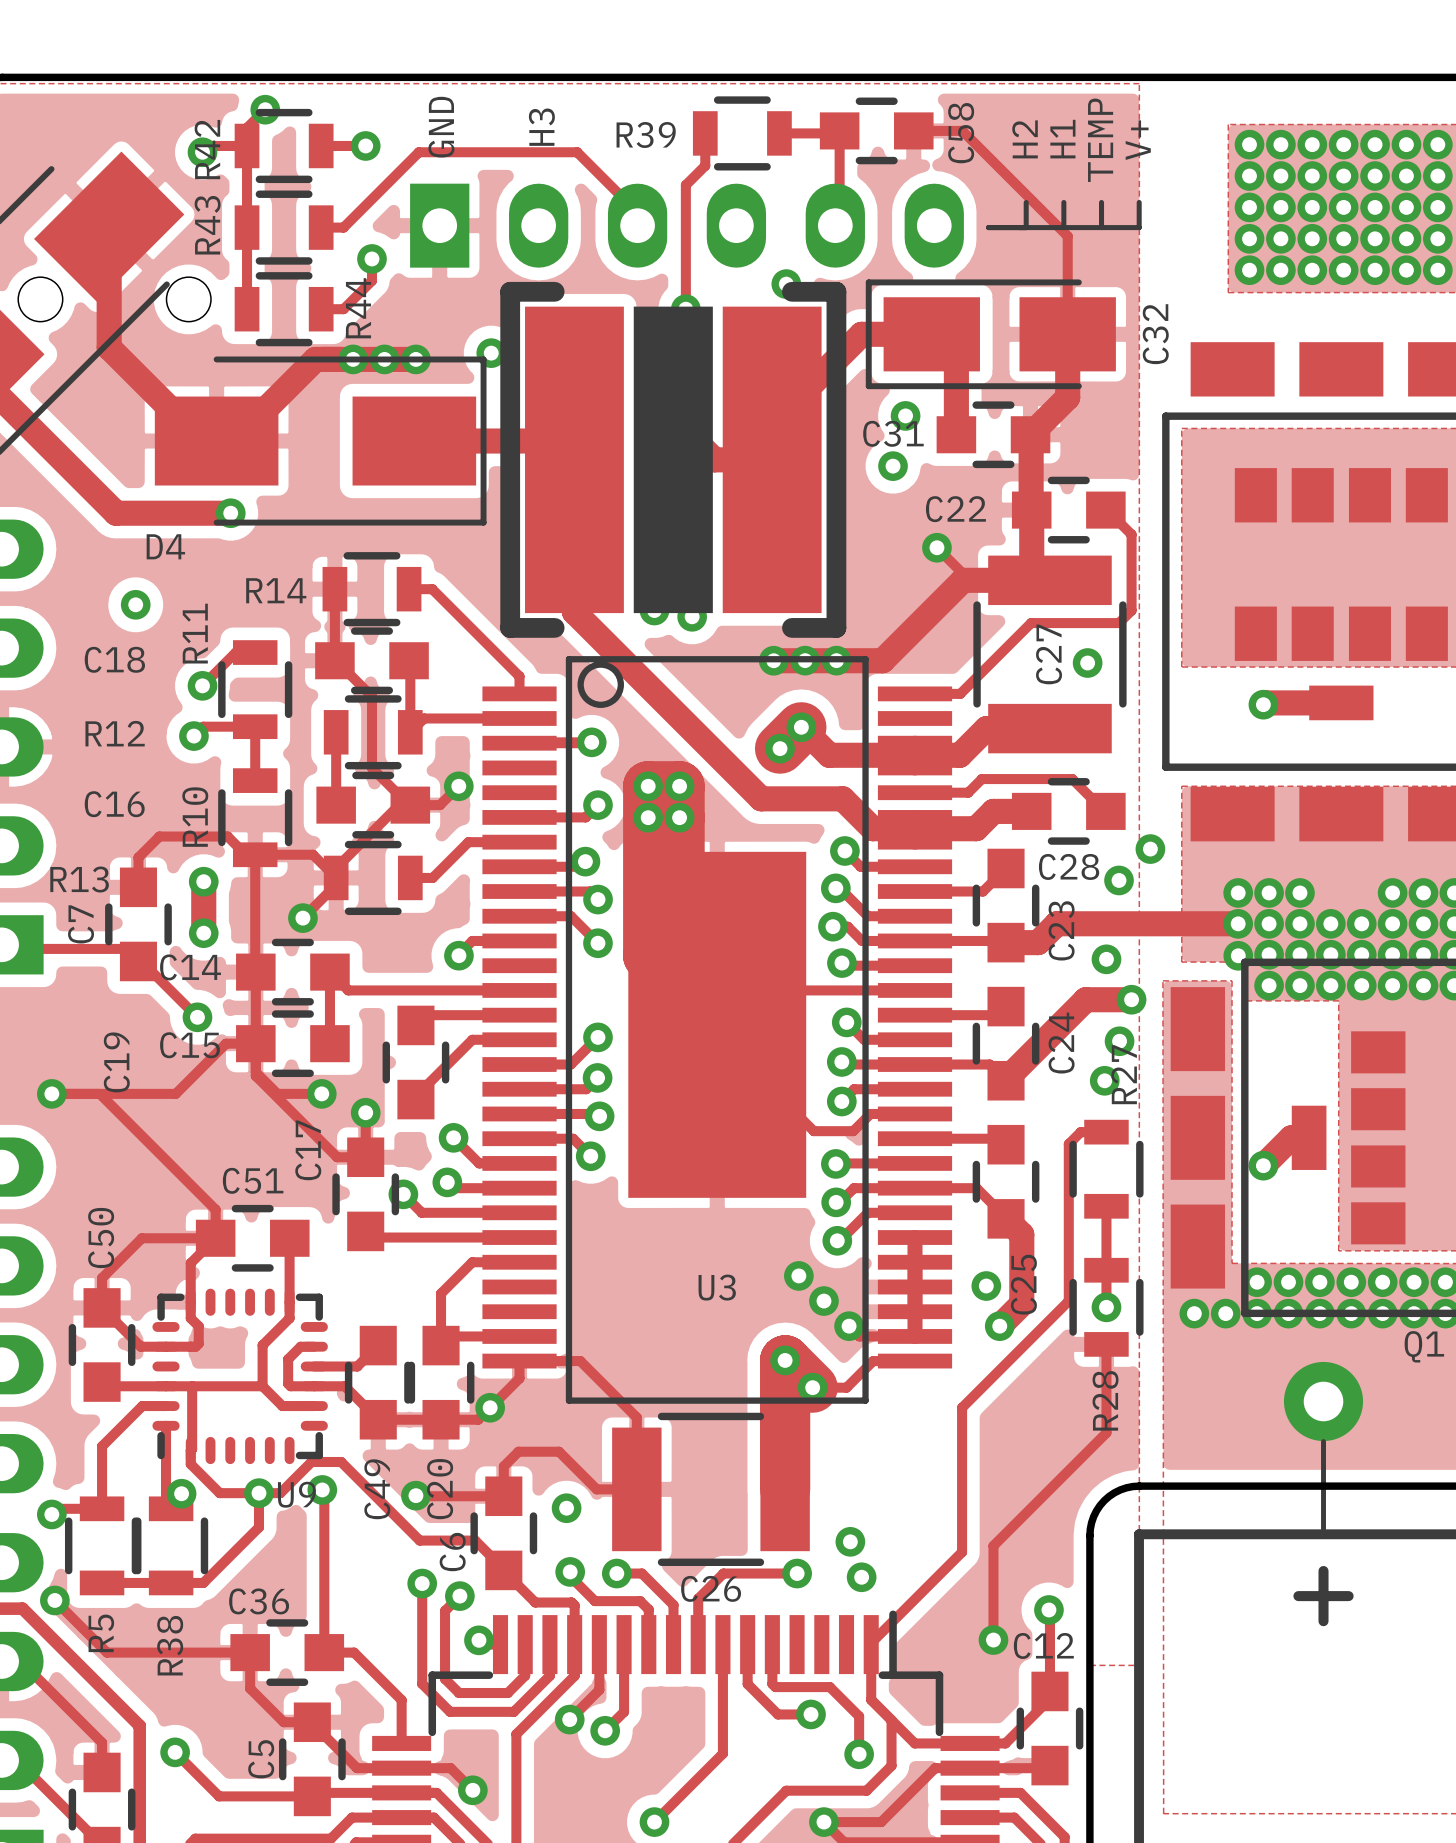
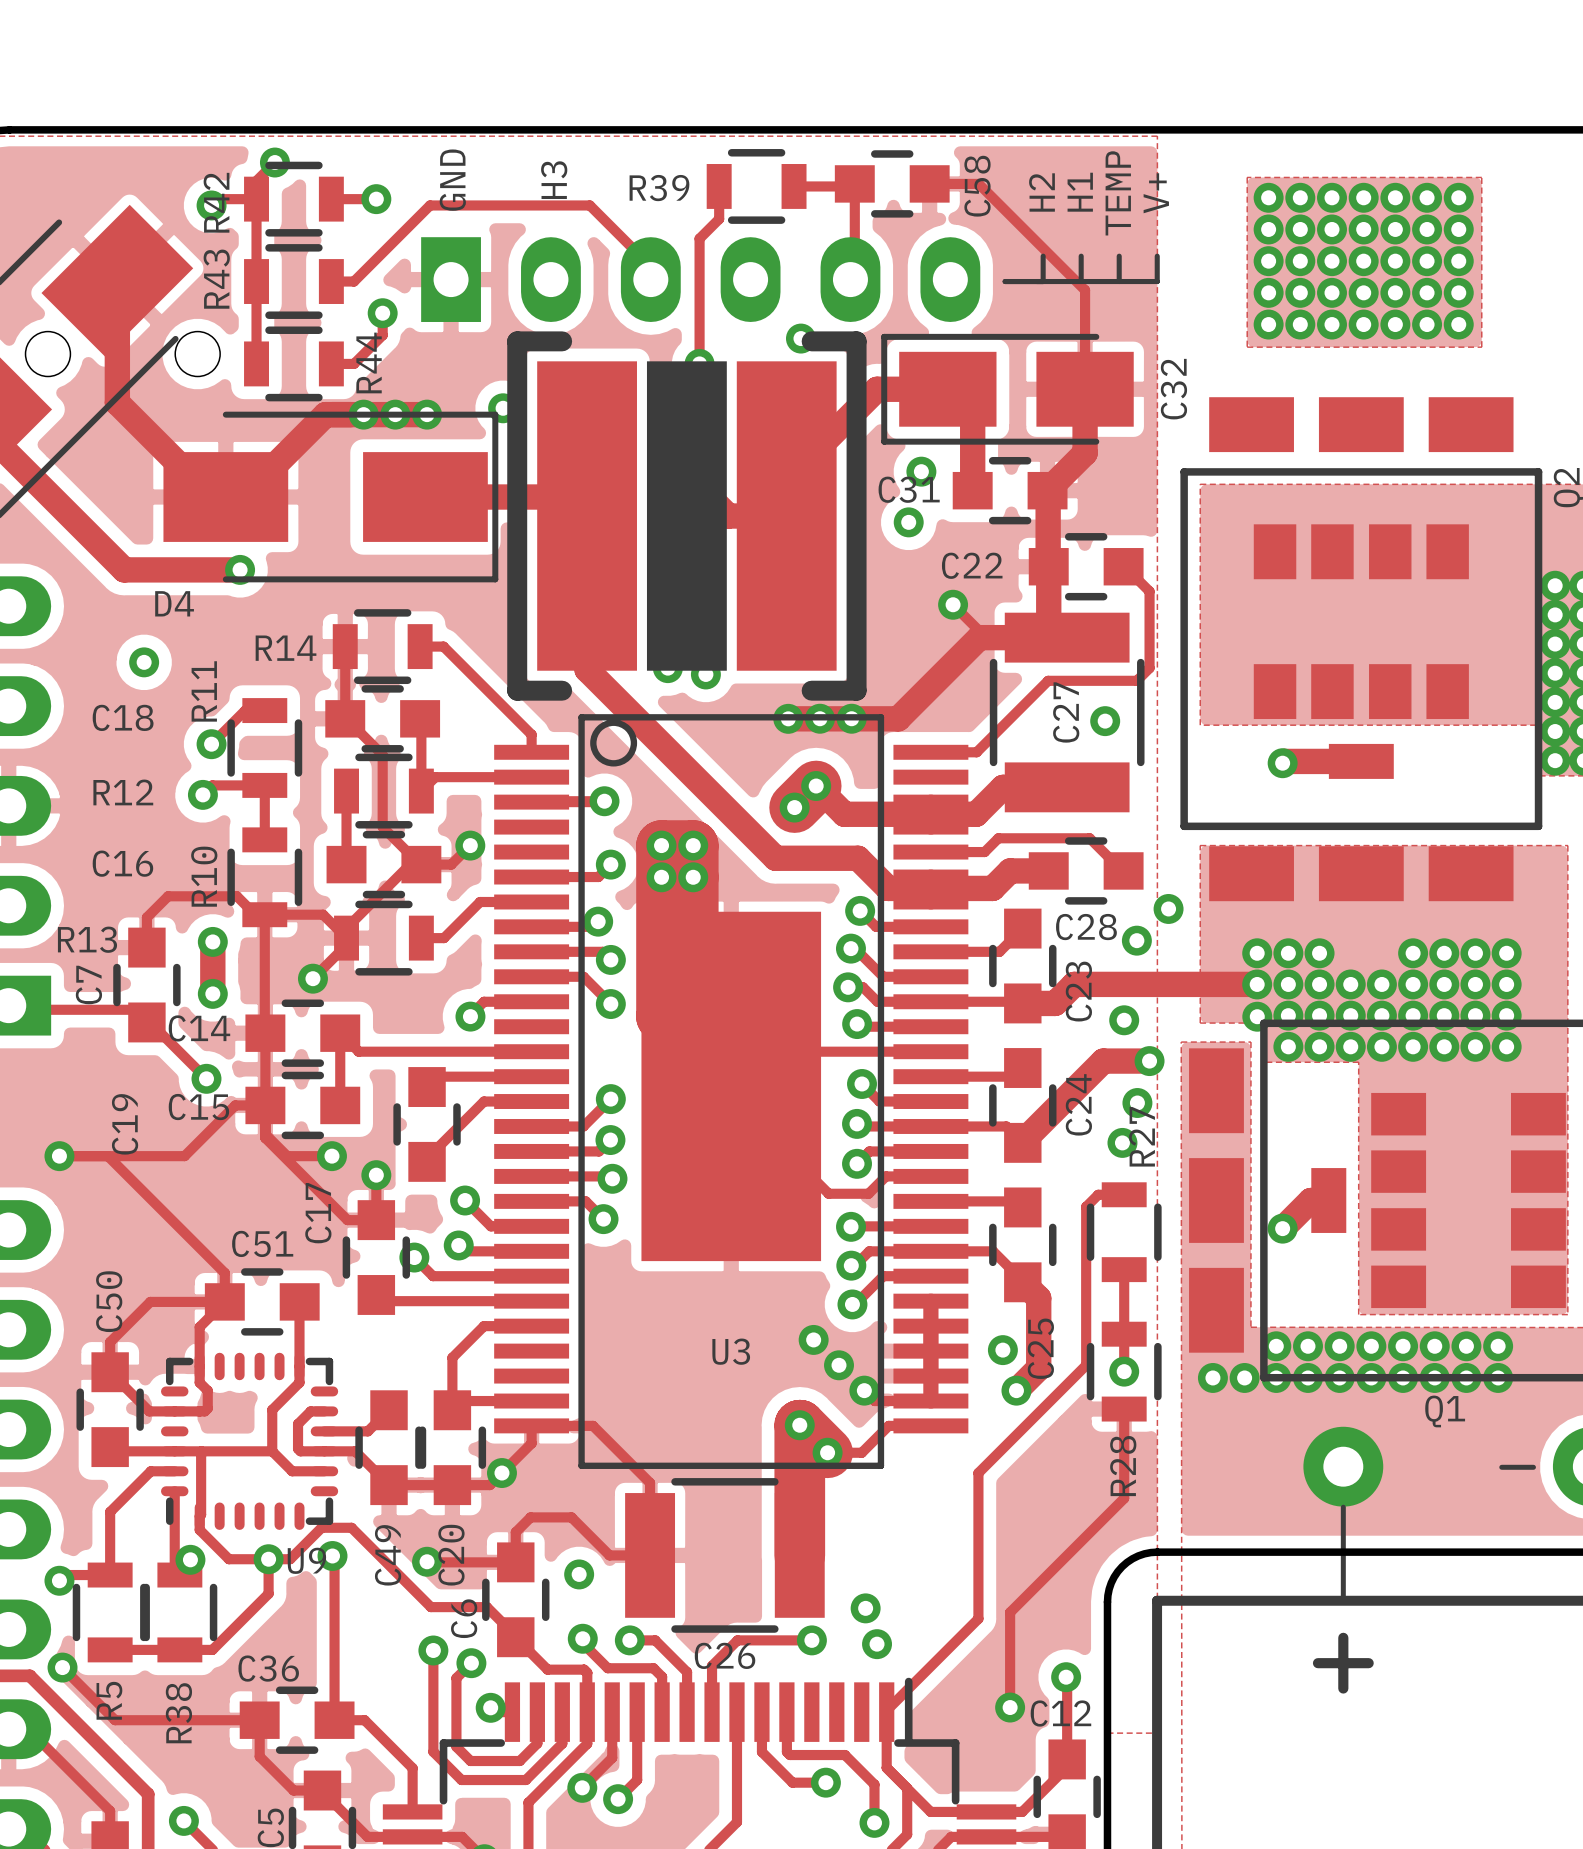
part footprint: [500, 281, 847, 638] -> [507, 331, 867, 701]

